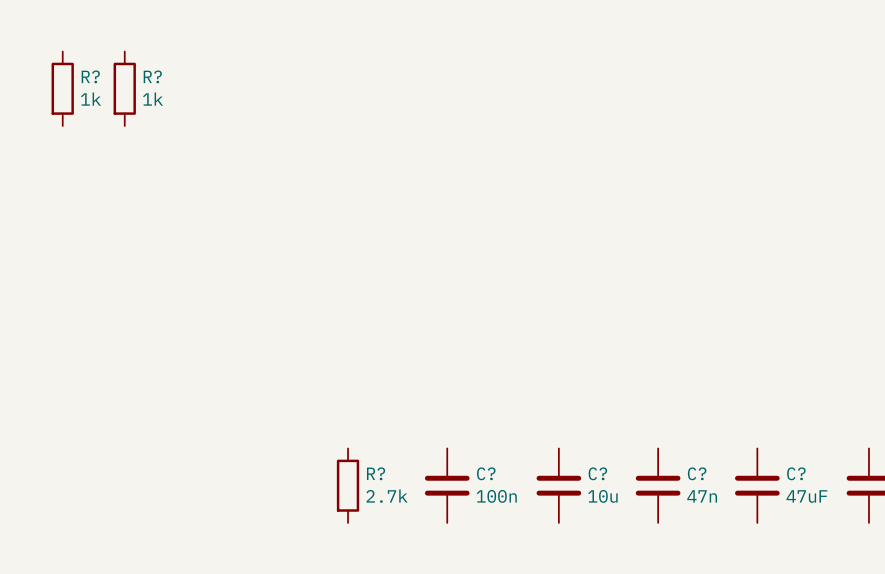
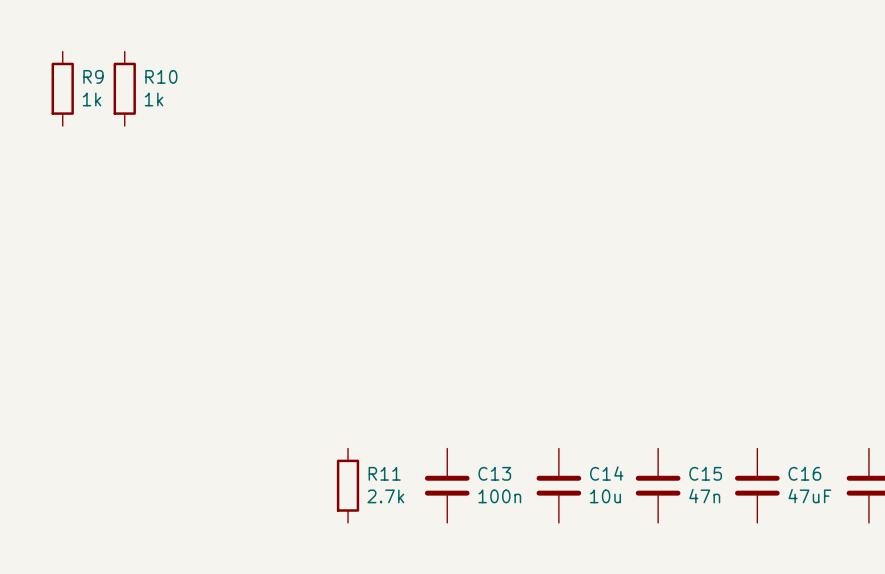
R? name: R? (90, 76) -> R9 (93, 76)
R? name: R? (152, 76) -> R10 (161, 76)
R? name: R? (376, 473) -> R11 (384, 473)
C? name: C? (486, 473) -> C13 (494, 473)
C? name: C? (597, 473) -> C14 (606, 473)
C? name: C? (697, 473) -> C15 (705, 473)
C? name: C? (796, 473) -> C16 (804, 473)

